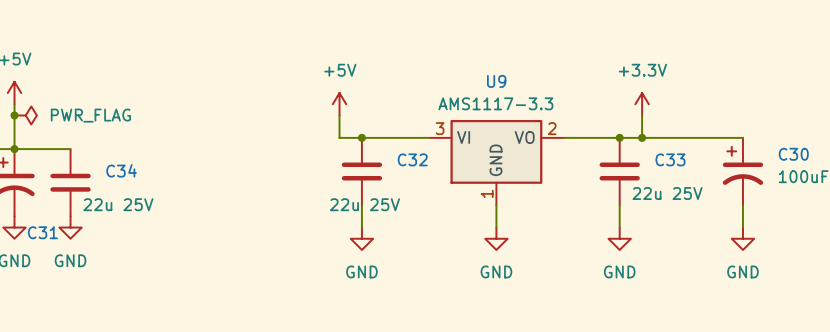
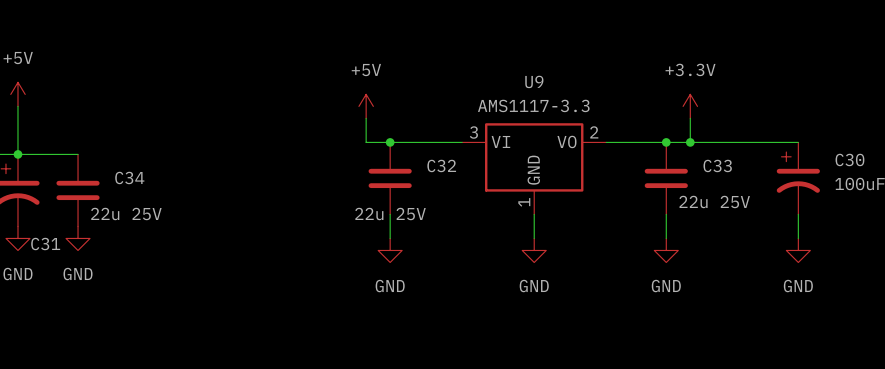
junction: (14, 115) -> none
power symbol: PWR_FLAG (25, 115) -> none

